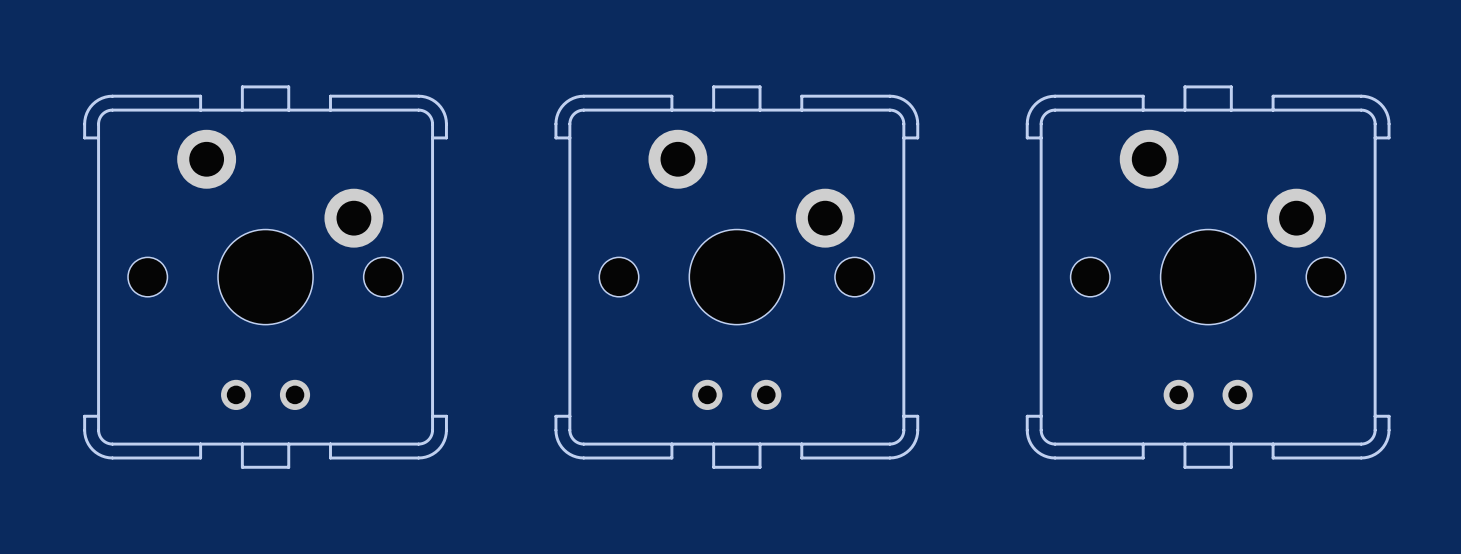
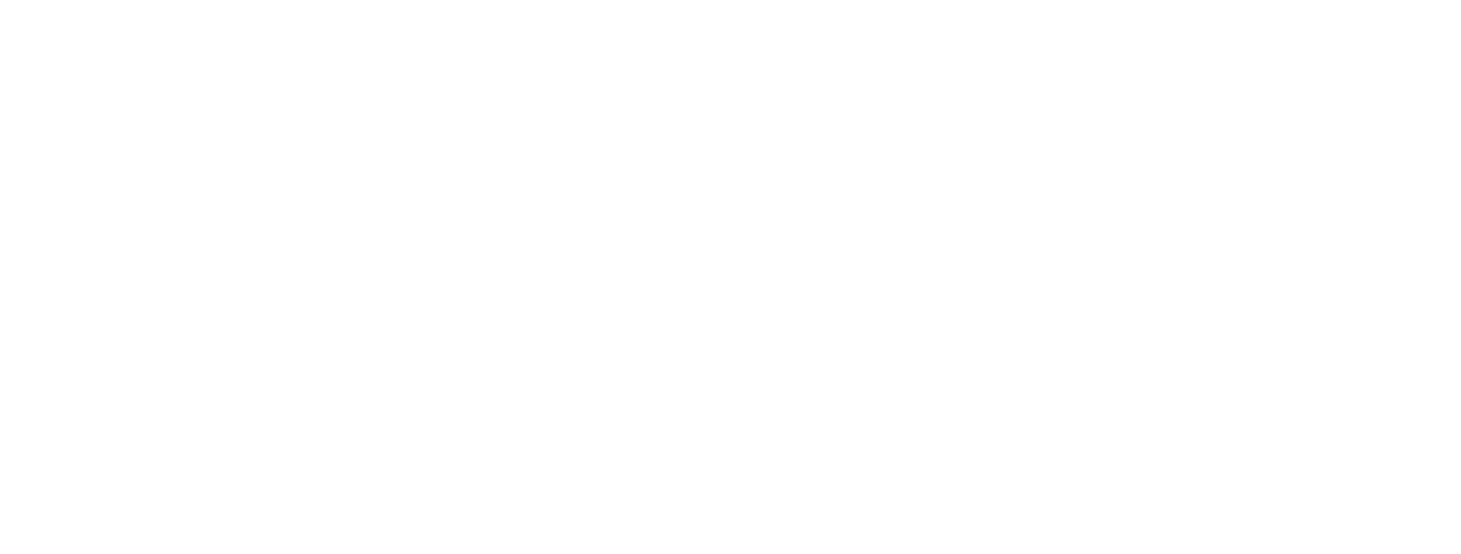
part: (265, 277) -> none
part: (736, 277) -> none
part: (1208, 277) -> none

